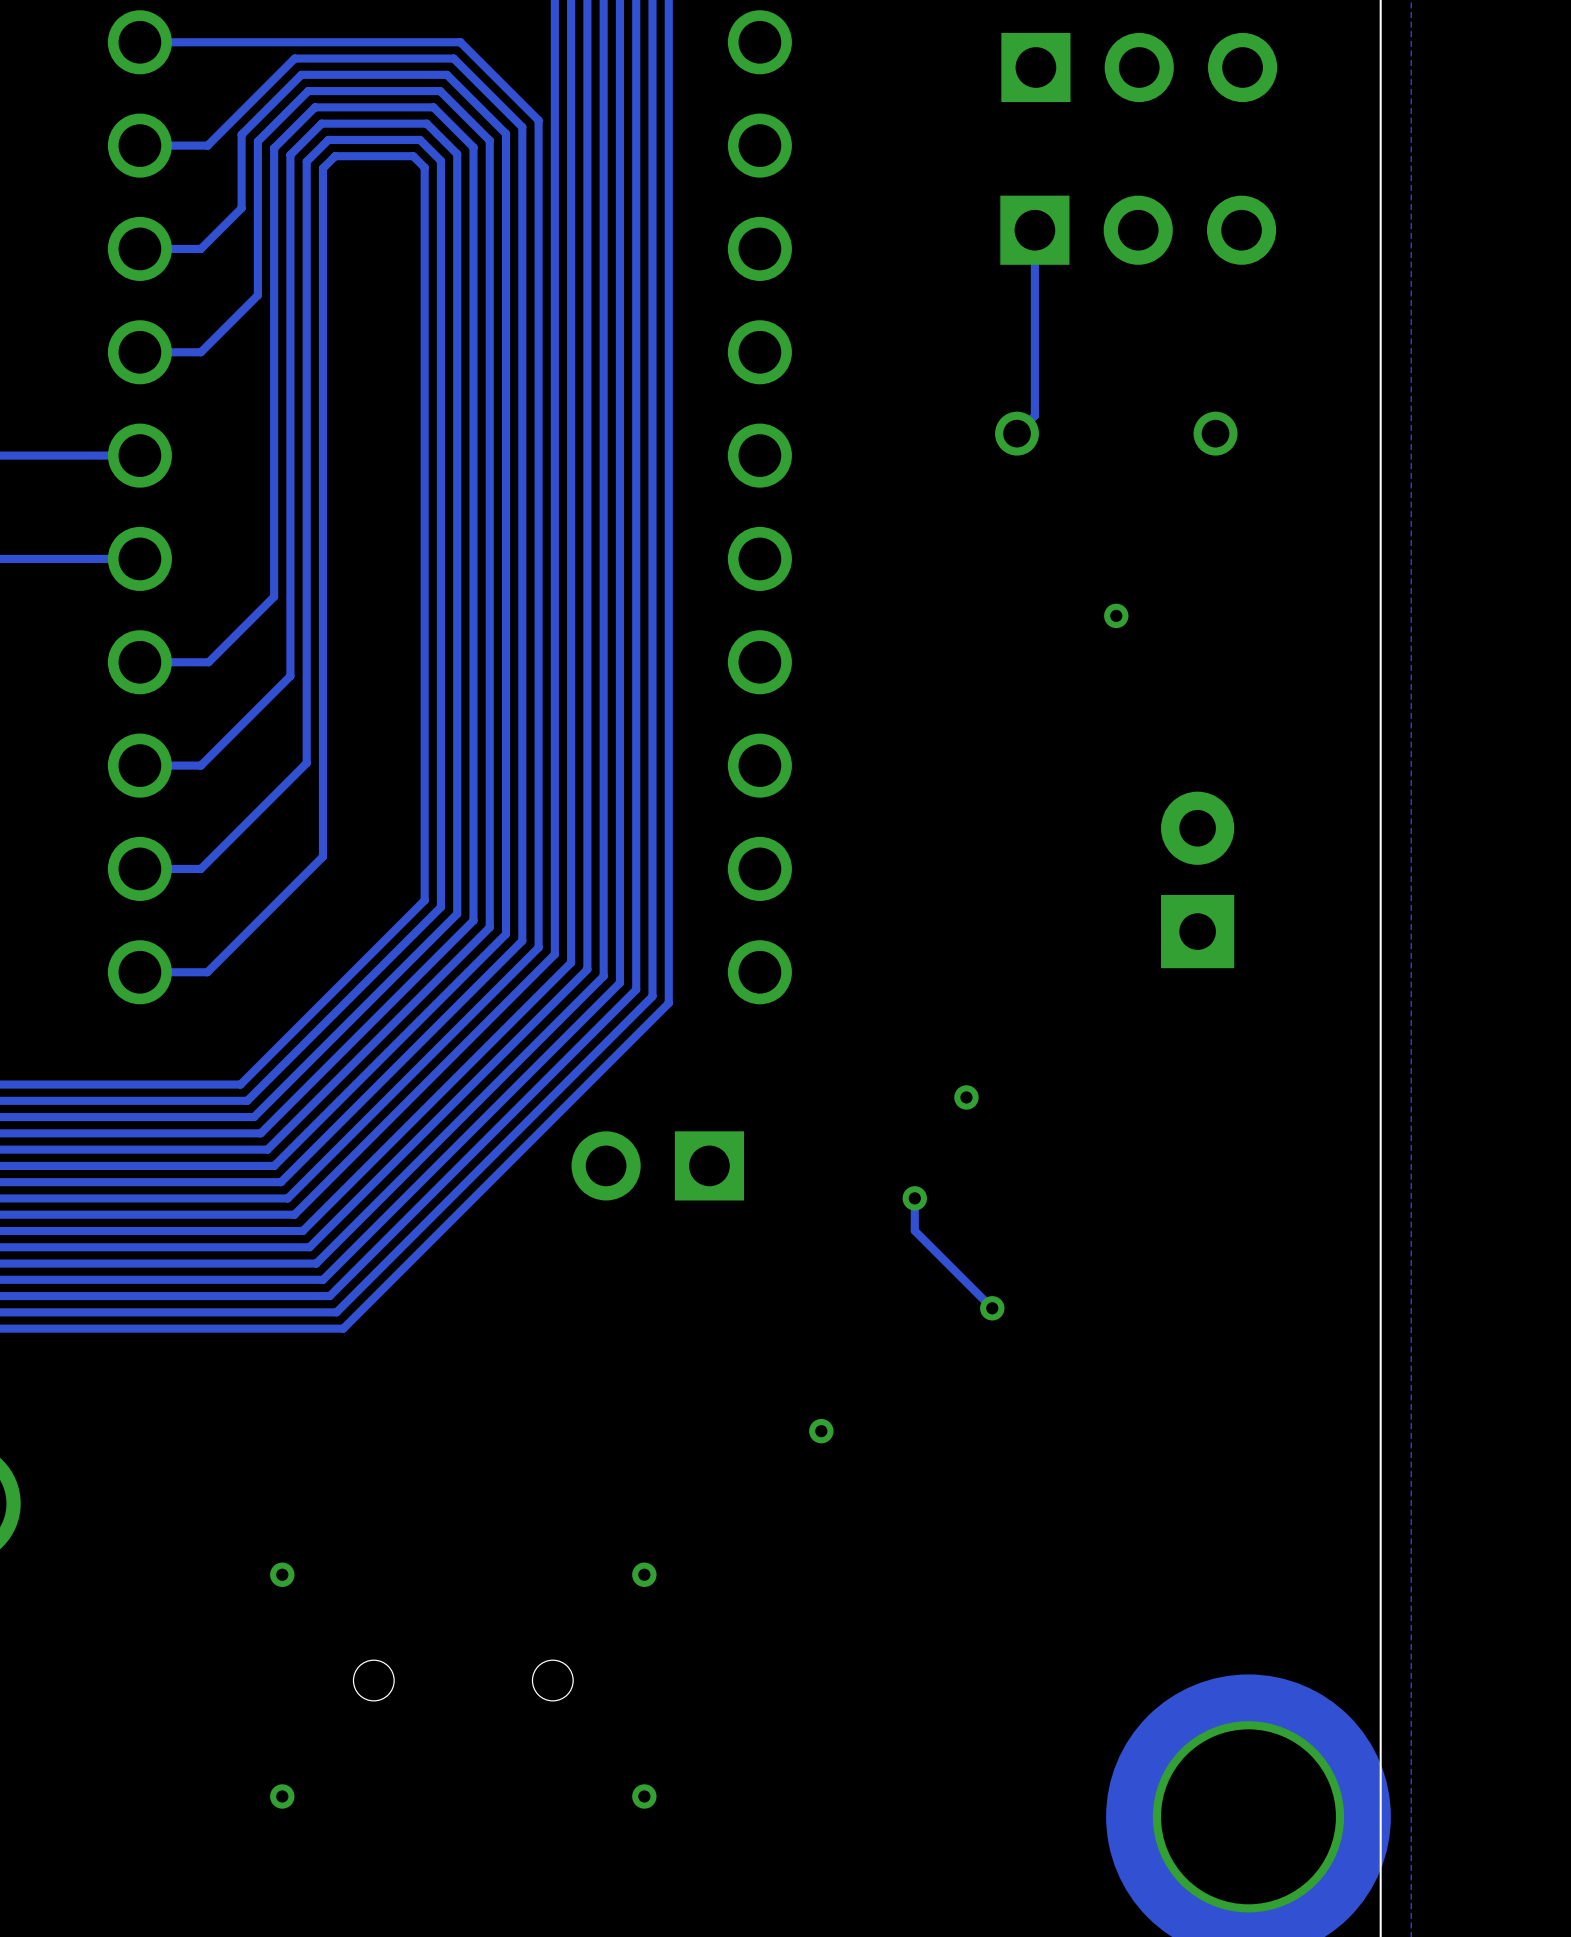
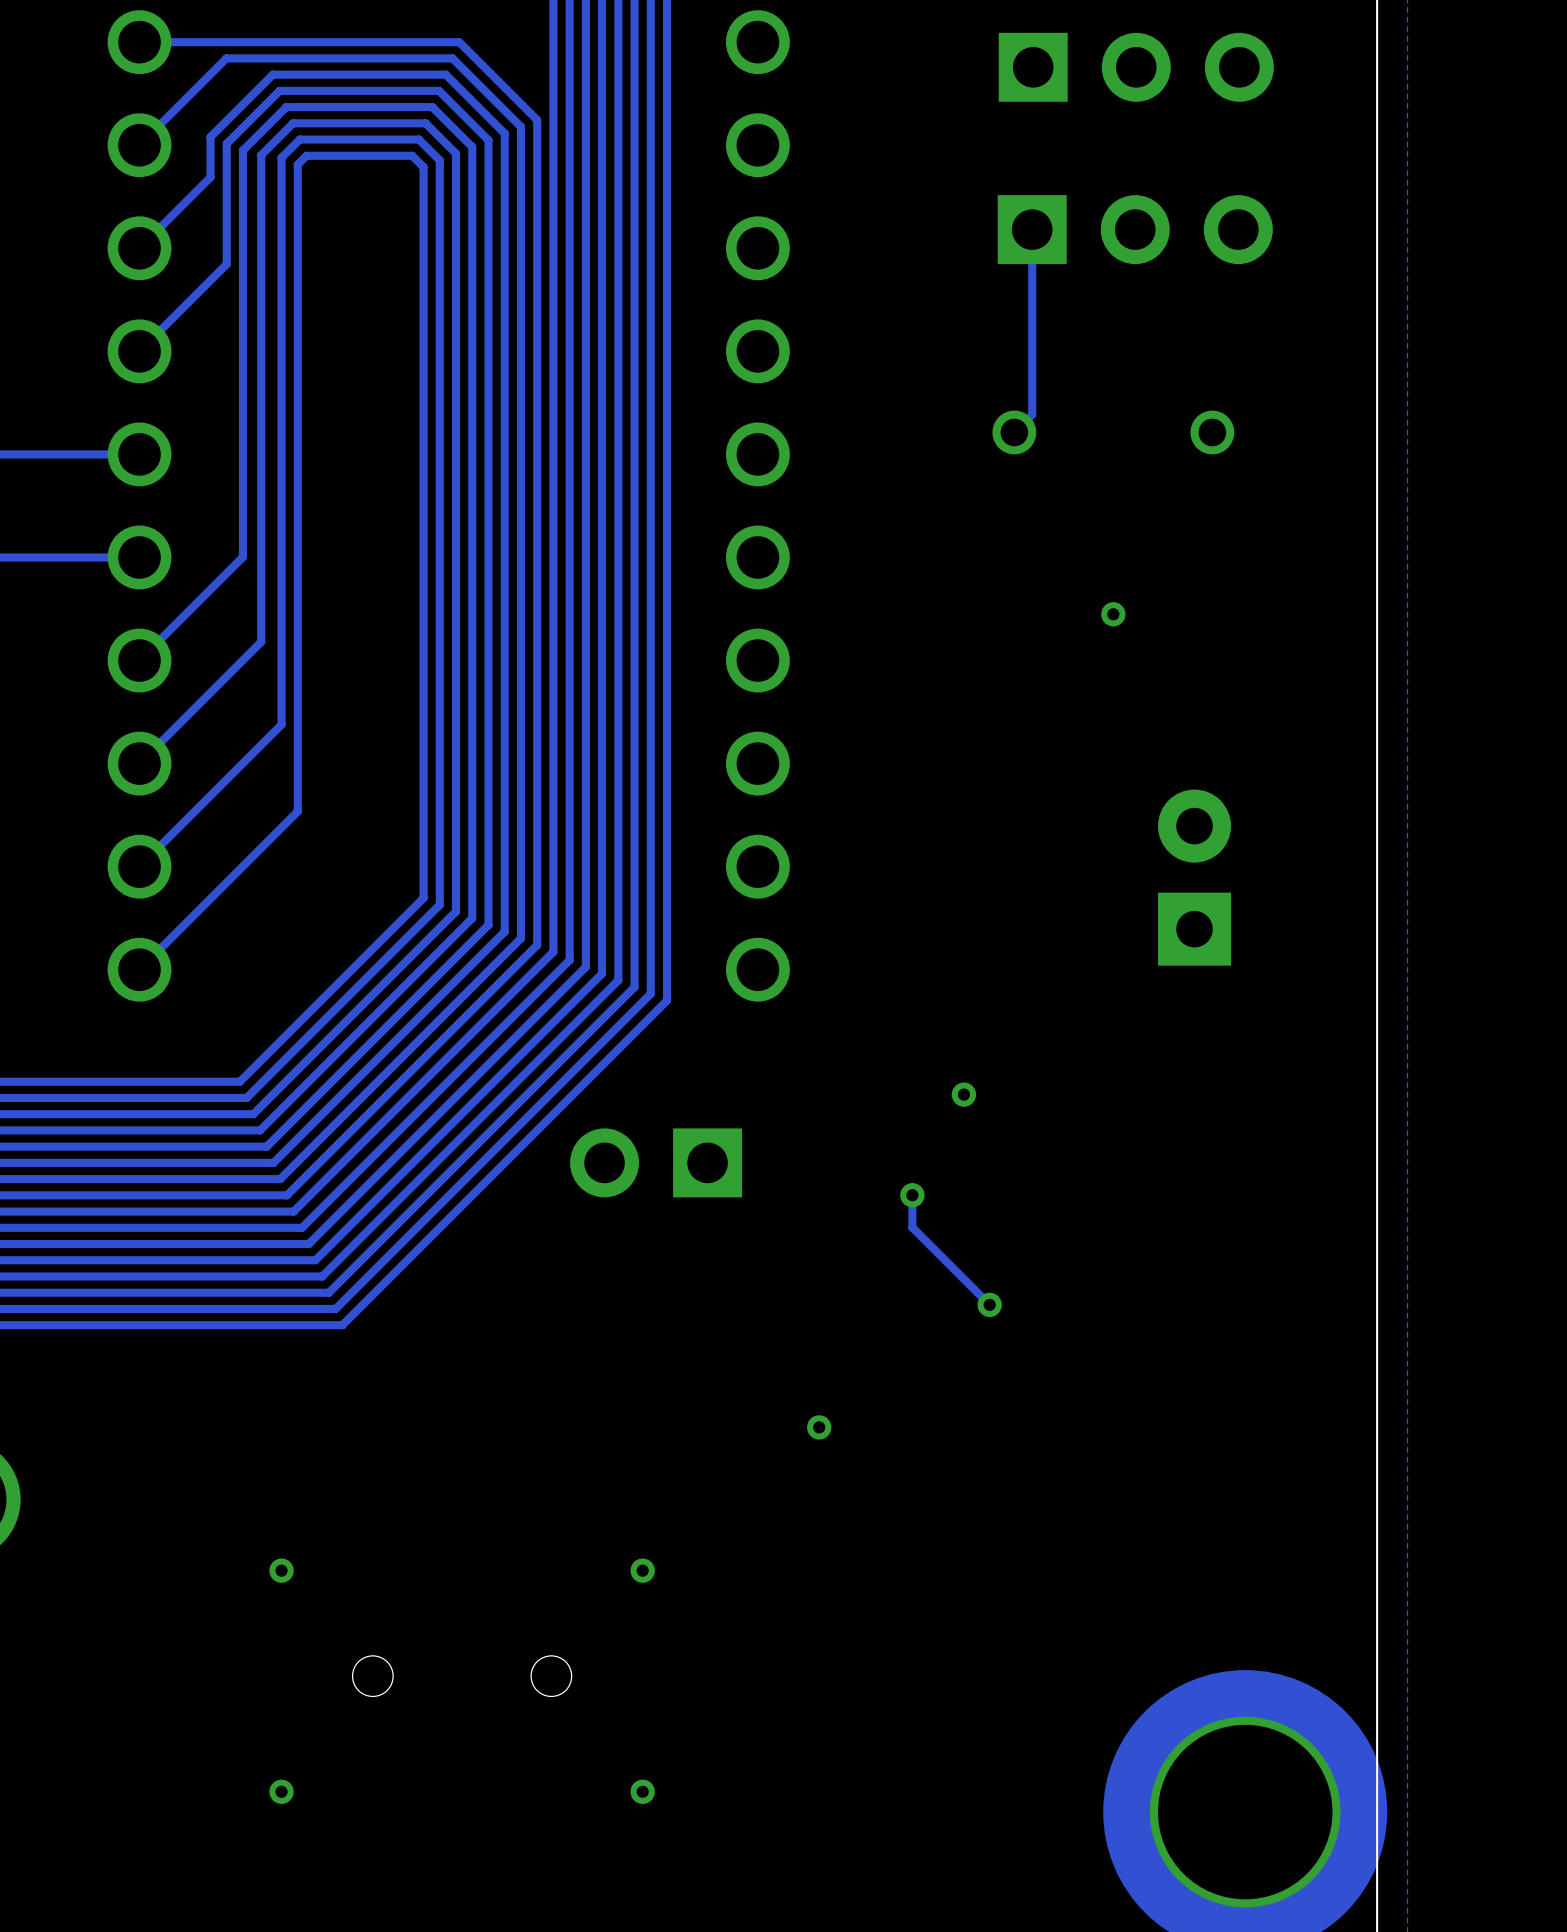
track: (294, 58) (207, 145) (139, 145) -> (293, 58) (226, 58) (139, 145)
track: (301, 74) (241, 134) (241, 208) (200, 248) (139, 248) -> (300, 74) (272, 74) (210, 137) (210, 177) (139, 248)
track: (308, 91) (257, 141) (257, 295) (200, 352) (139, 352) -> (307, 90) (279, 90) (226, 143) (226, 264) (139, 351)
track: (314, 107) (274, 148) (274, 596) (208, 662) (139, 662) -> (314, 107) (286, 107) (242, 150) (242, 557) (139, 660)
track: (321, 123) (290, 154) (290, 676) (200, 765) (139, 765) -> (320, 123) (293, 123) (261, 155) (261, 641) (139, 763)
track: (328, 139) (306, 161) (306, 763) (200, 868) (139, 868) -> (327, 139) (299, 139) (281, 157) (281, 724) (139, 866)
track: (335, 156) (322, 168) (322, 856) (207, 972) (139, 972) -> (334, 155) (306, 155) (297, 164) (297, 811) (139, 969)

